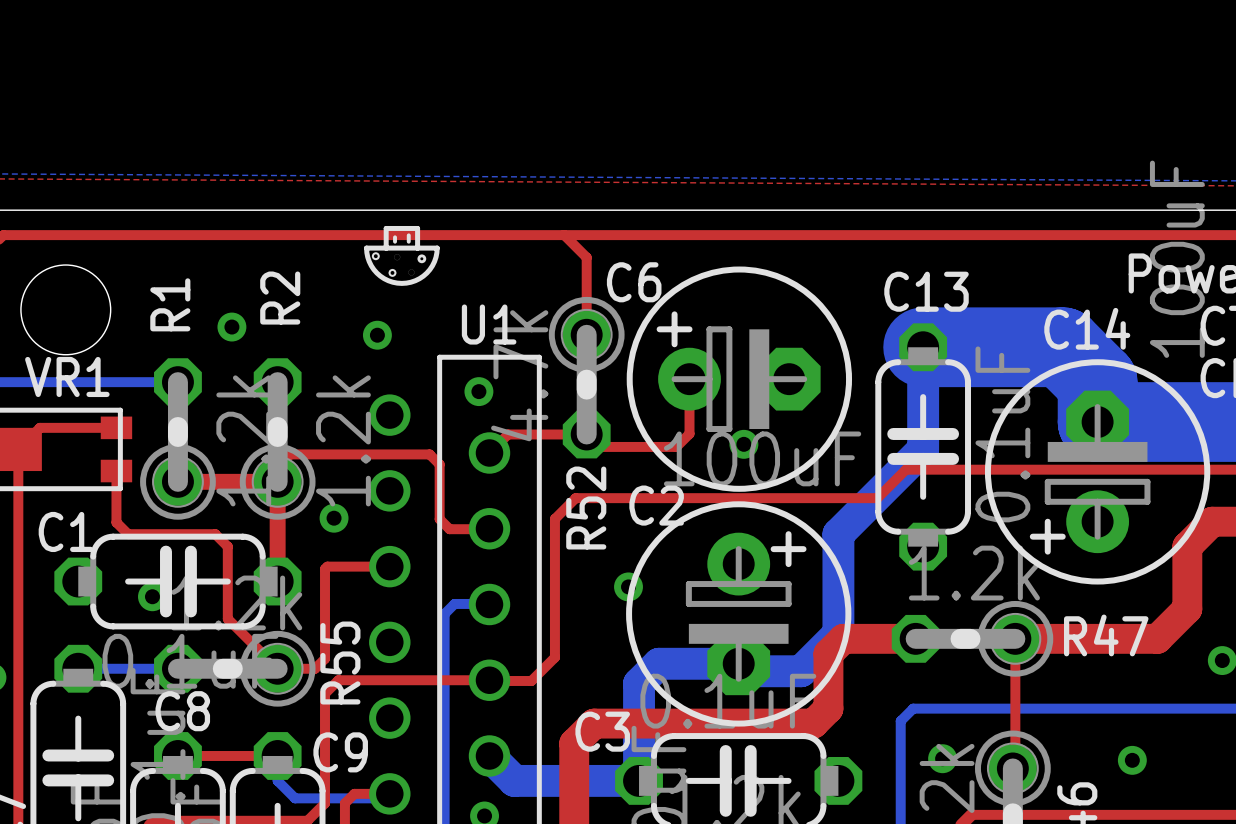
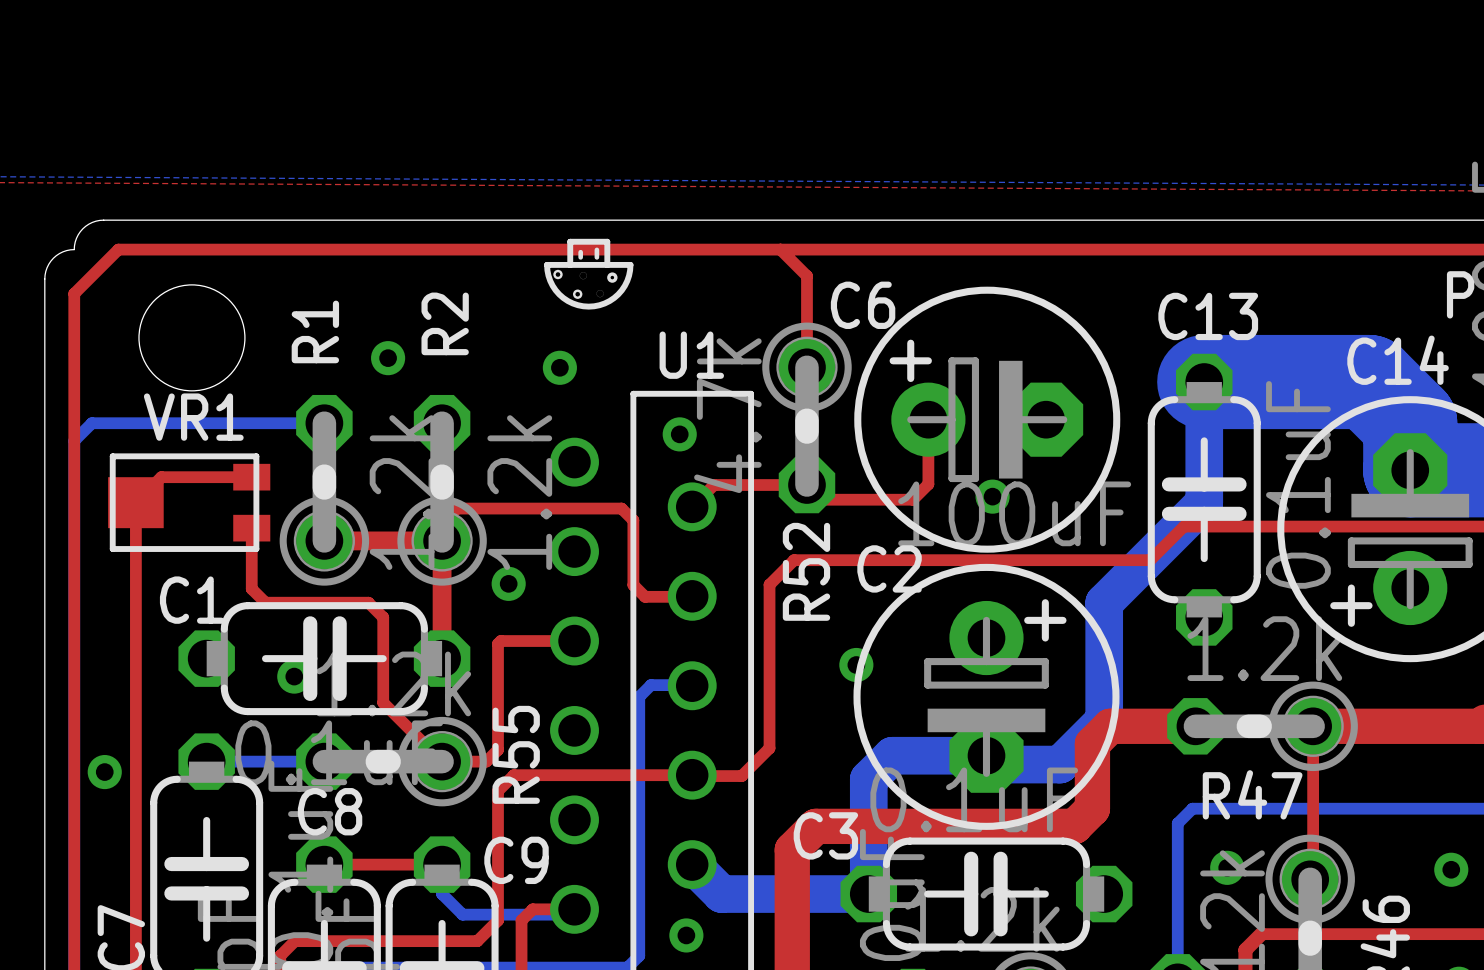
R47 name position: R47 (1106, 635) -> R47 (1252, 794)

